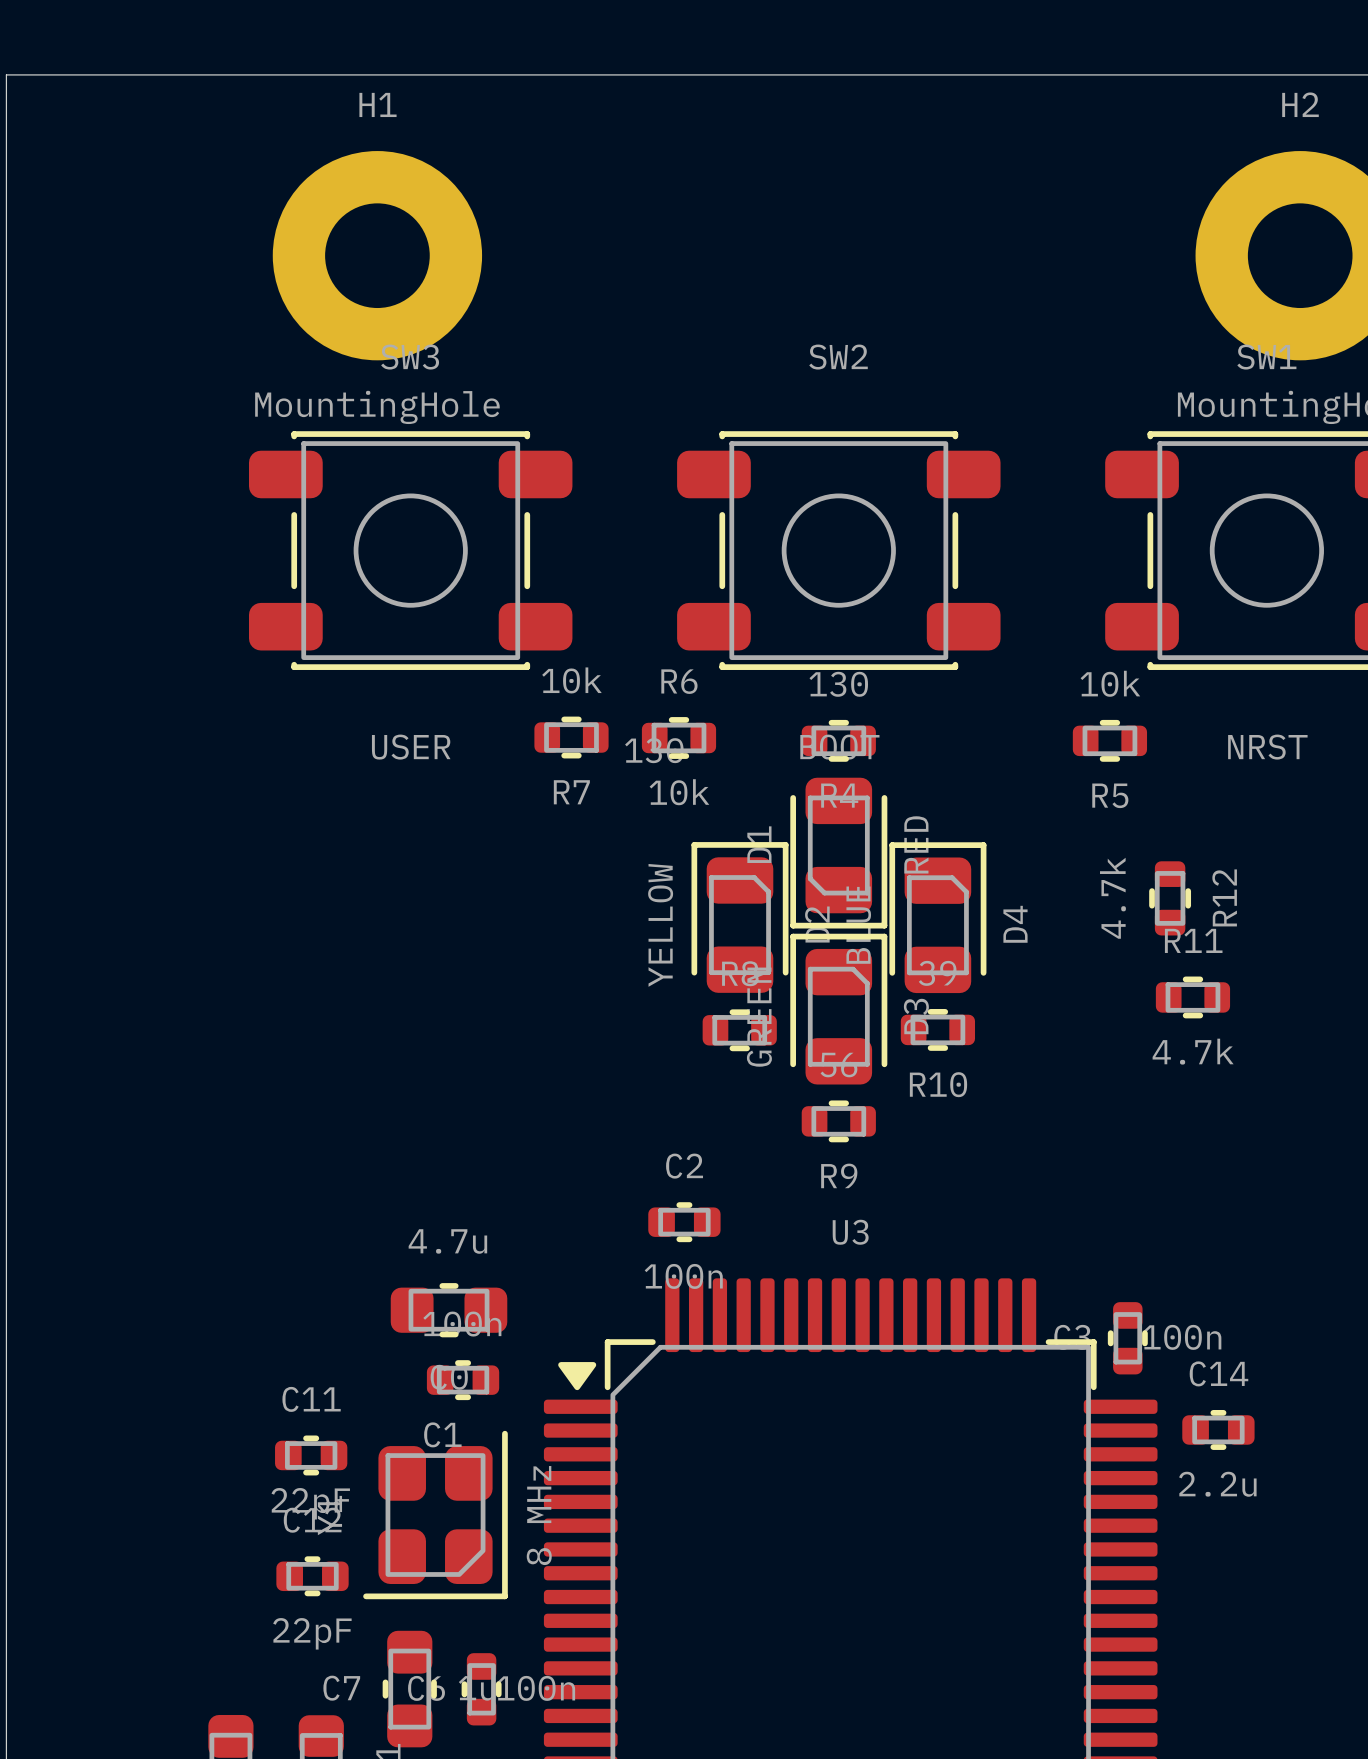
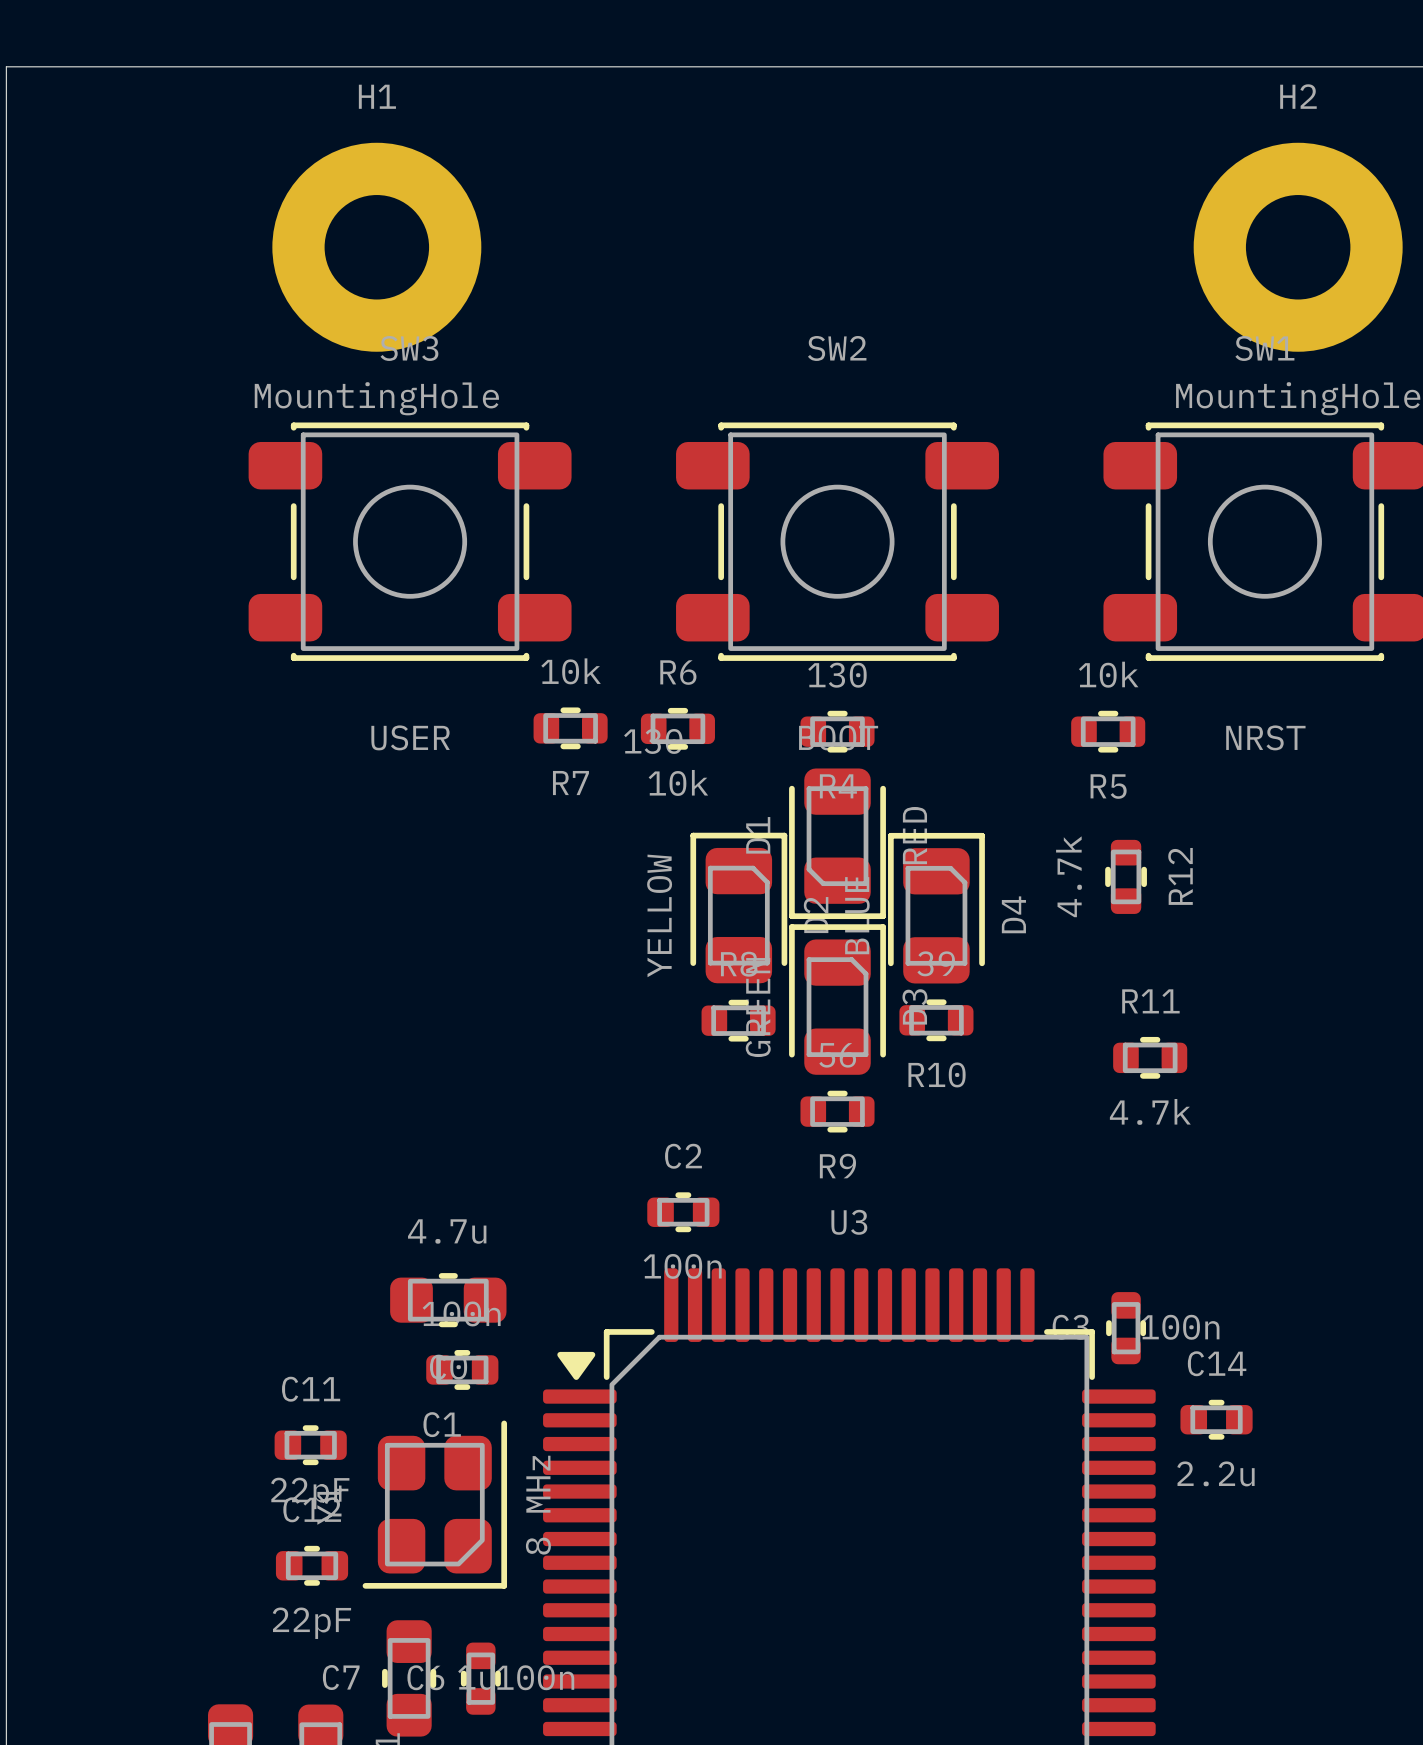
R12 position: (1170, 898) -> (1126, 876)
R11 position: (1192, 997) -> (1150, 1057)

